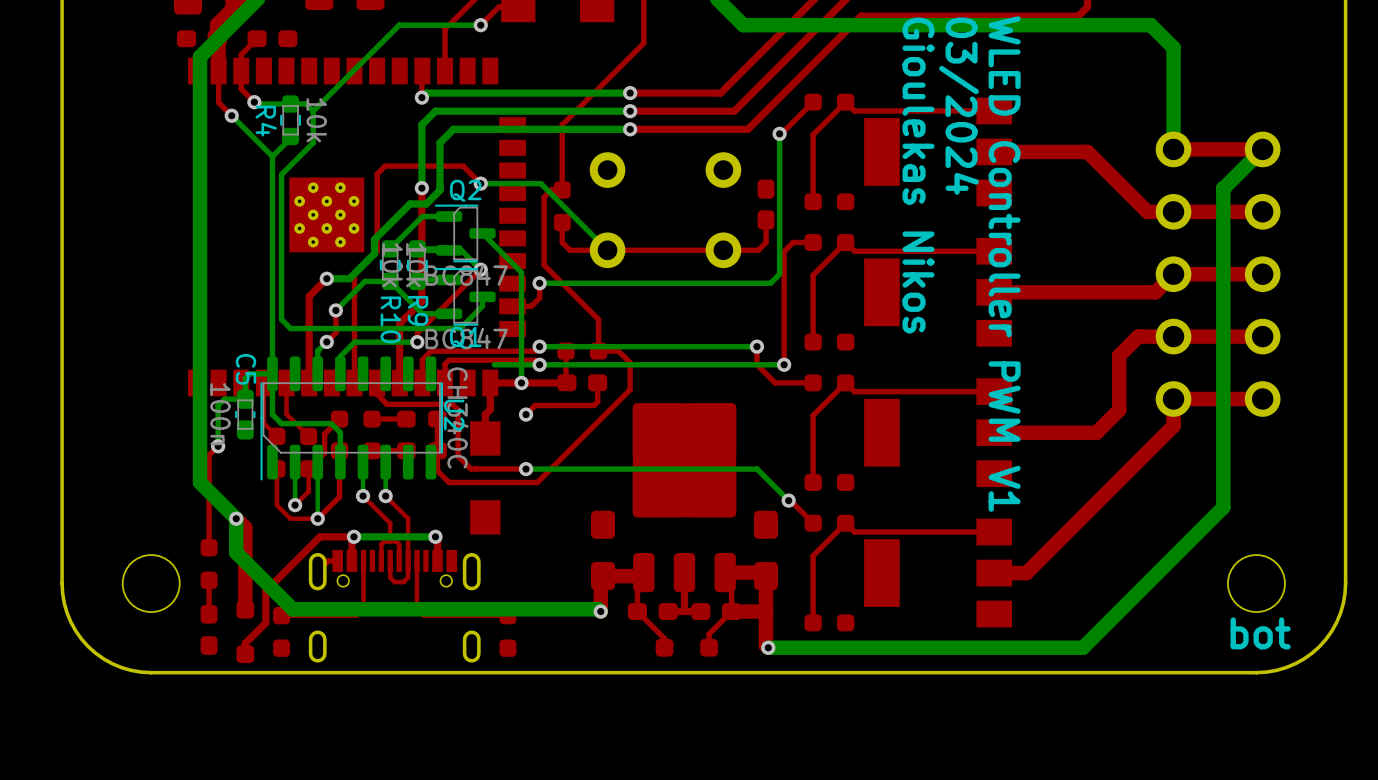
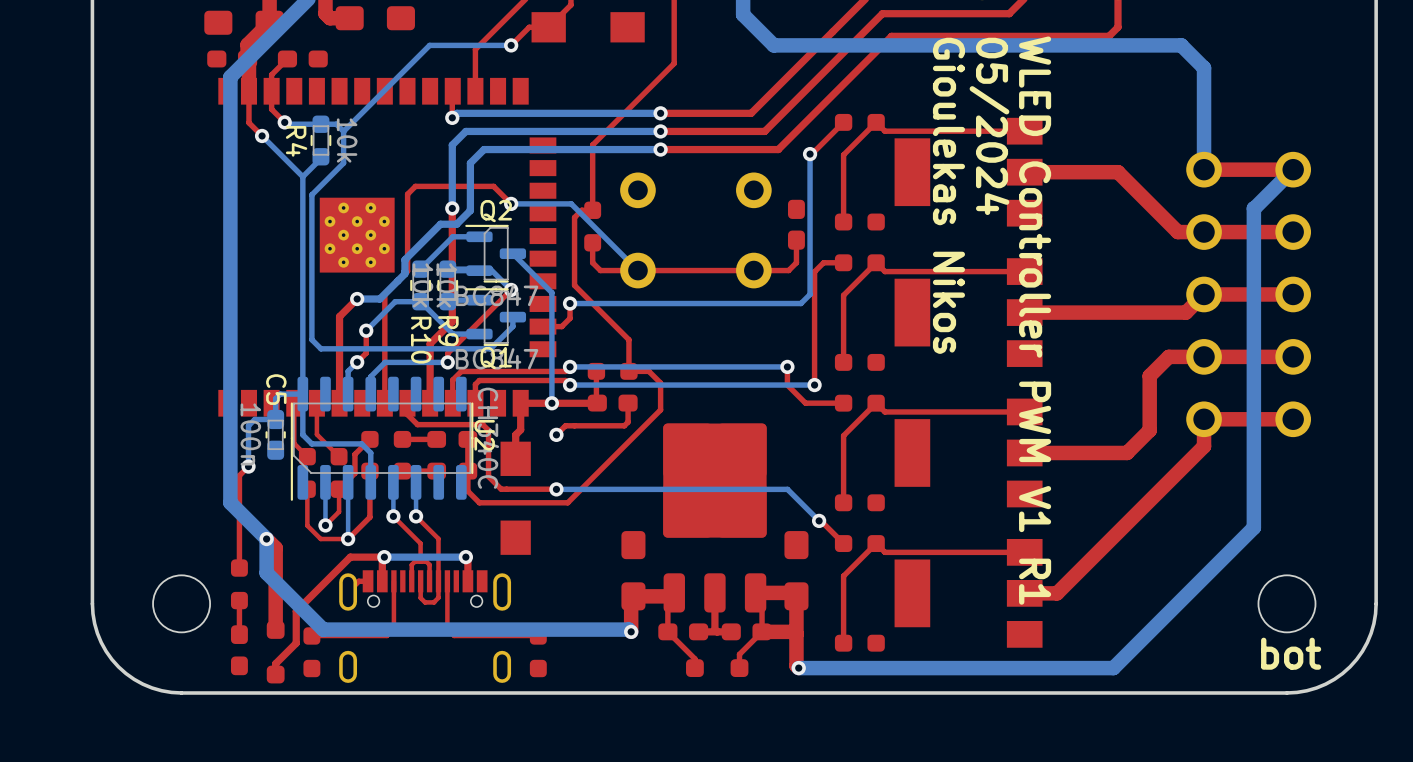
text: 03/2024 (959, 106) -> 05/2024 (989, 126)
text: WLED Controller PWM V1 (1004, 264) -> WLED Controller PWM V1 R1 (1035, 320)
bottom track: (539, 364) (494, 364) -> none

